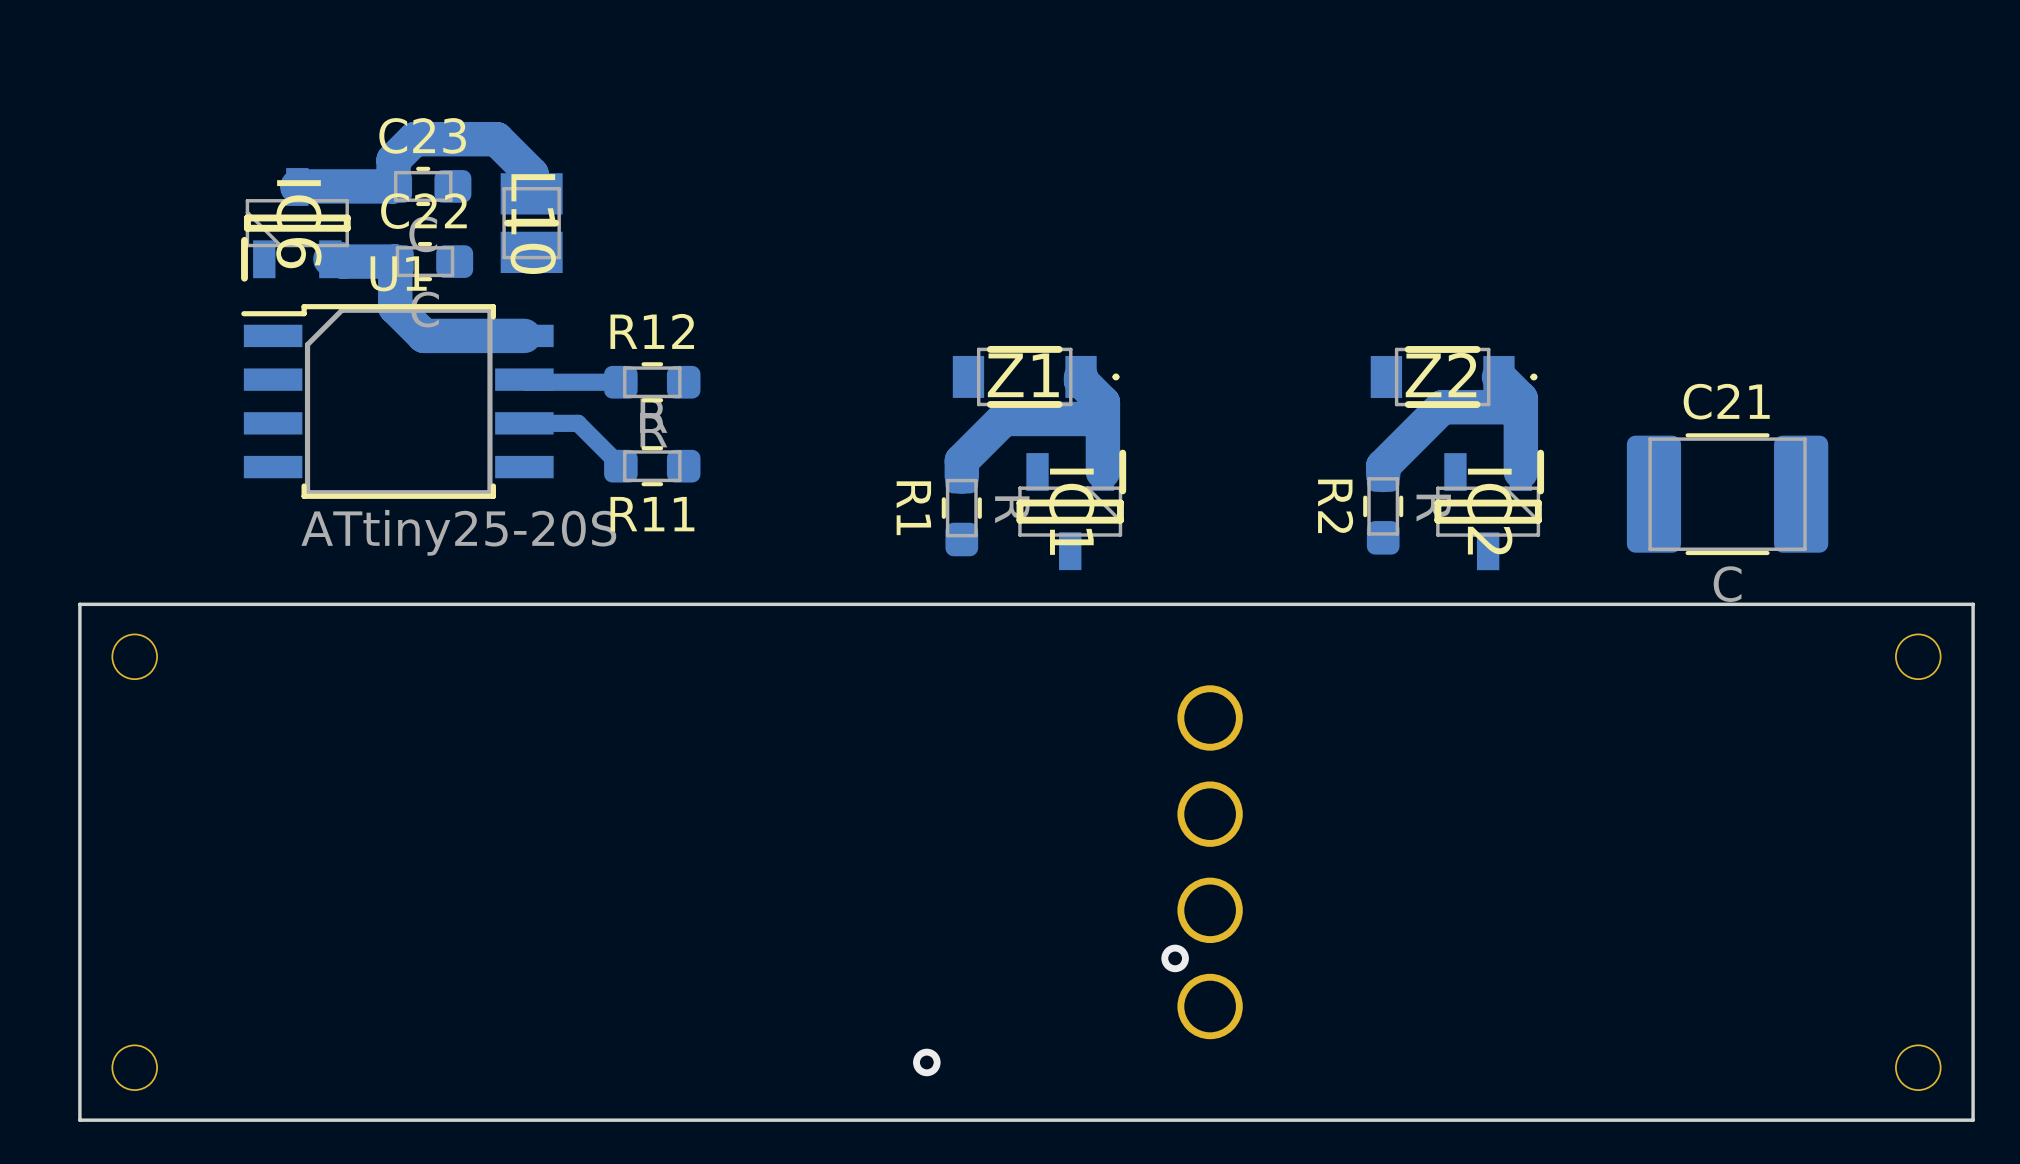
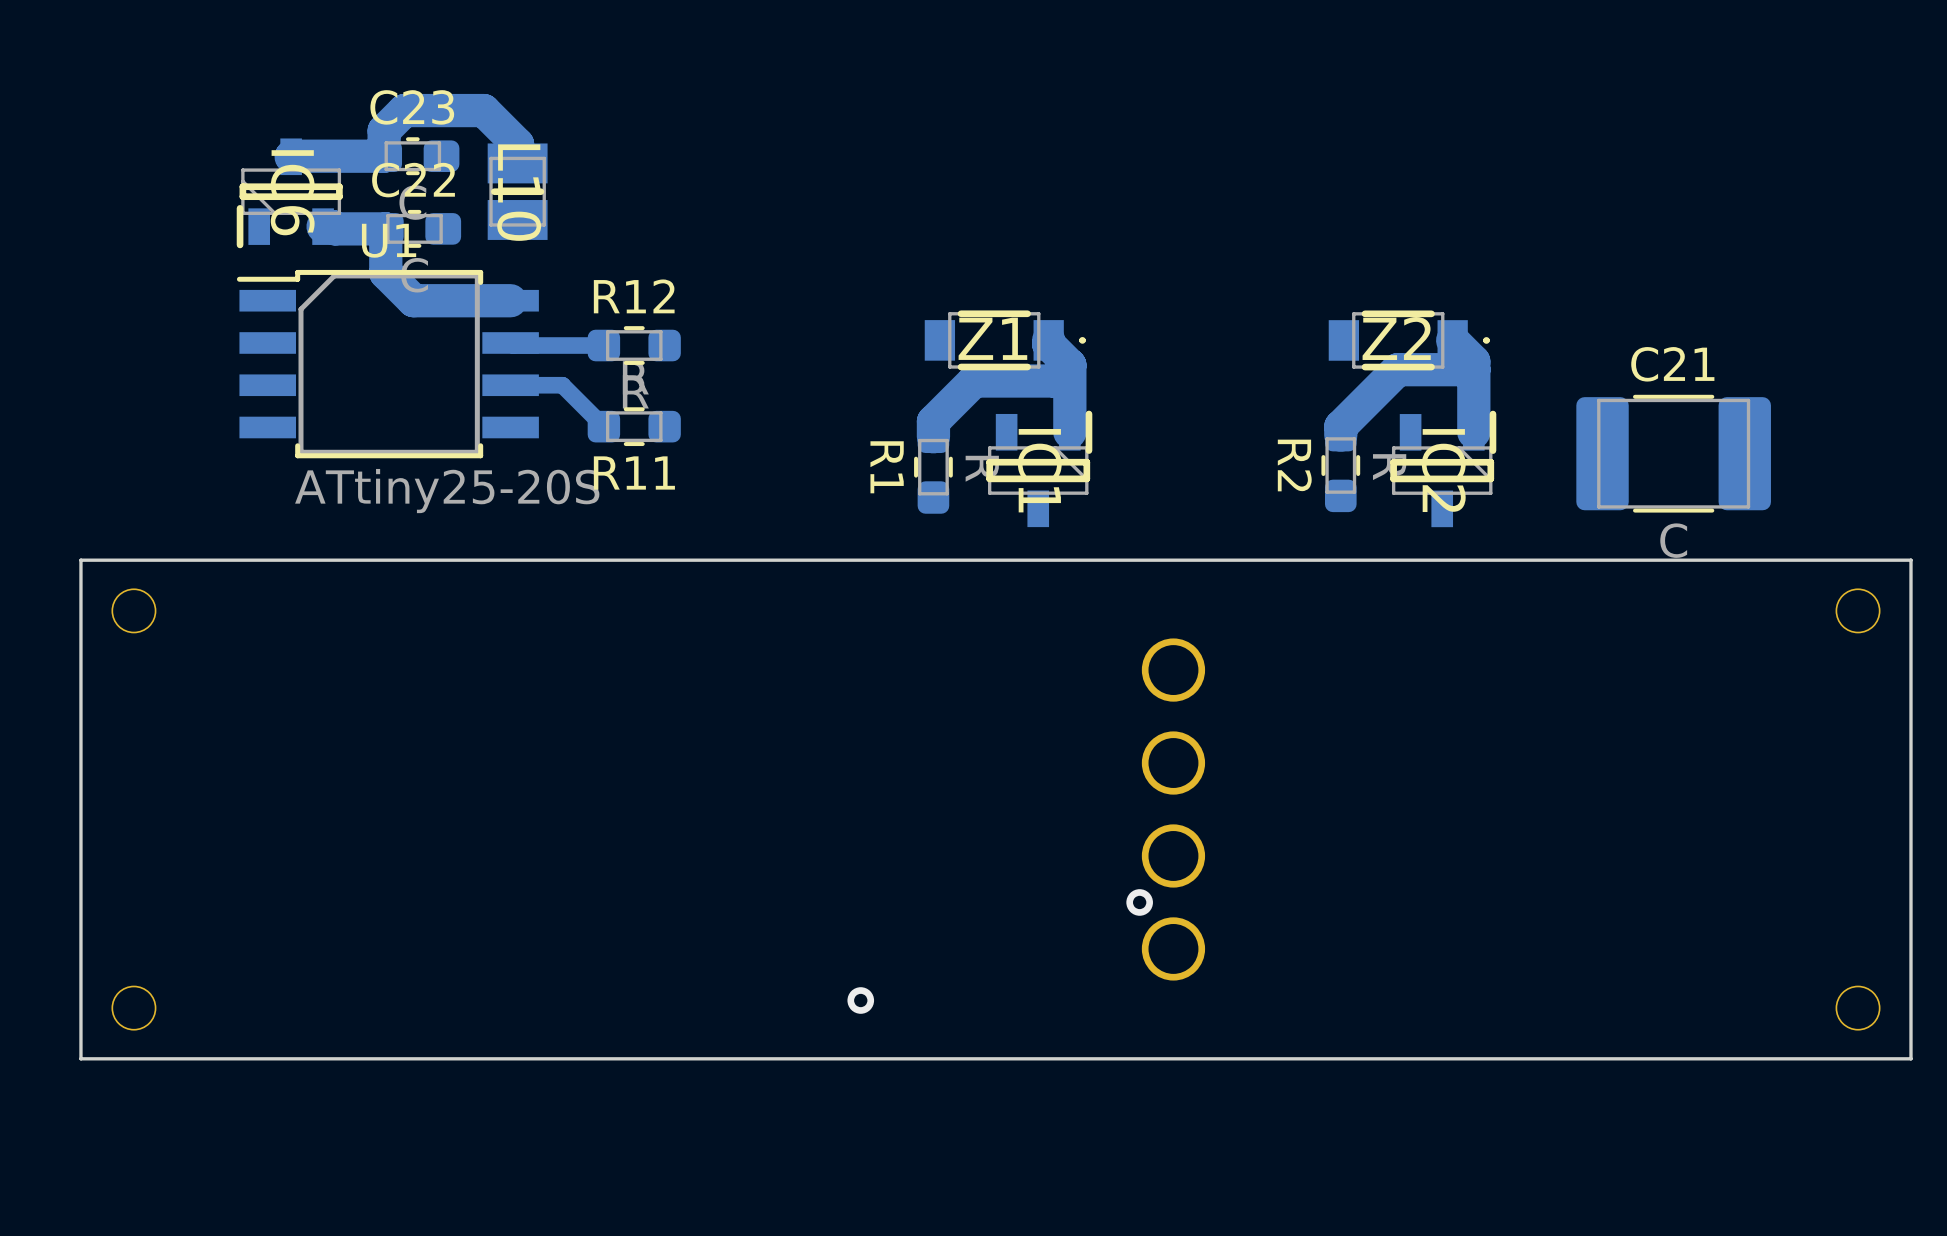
via position: (926, 1062) -> (860, 1000)

